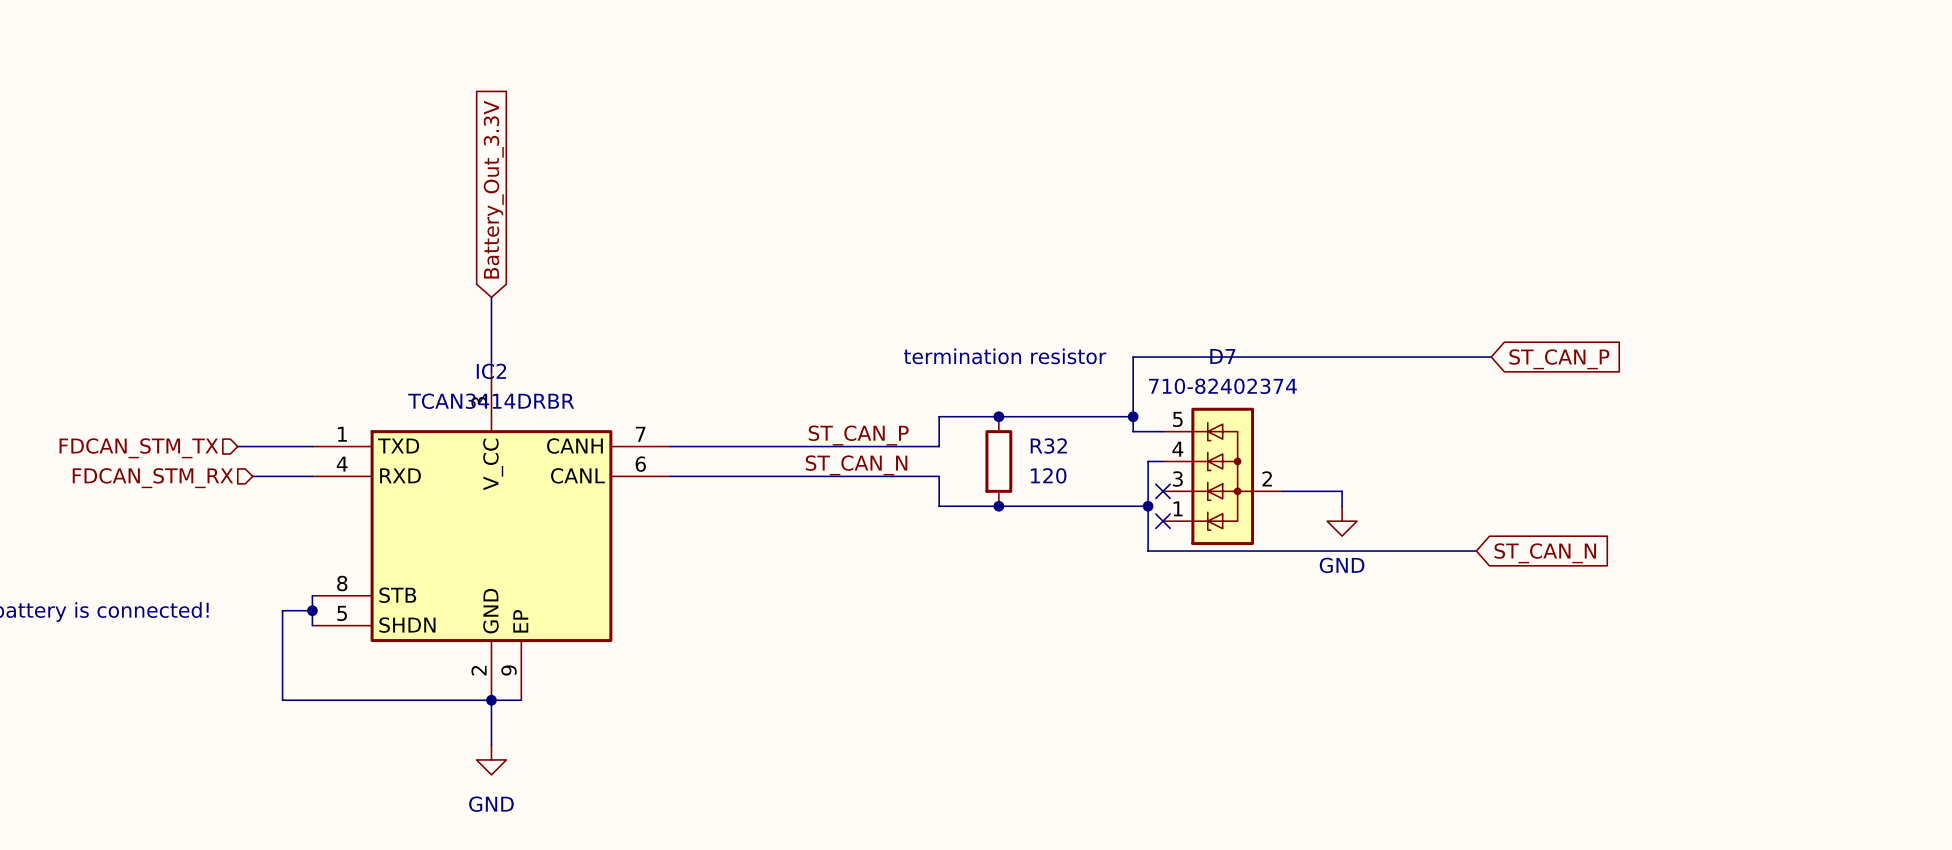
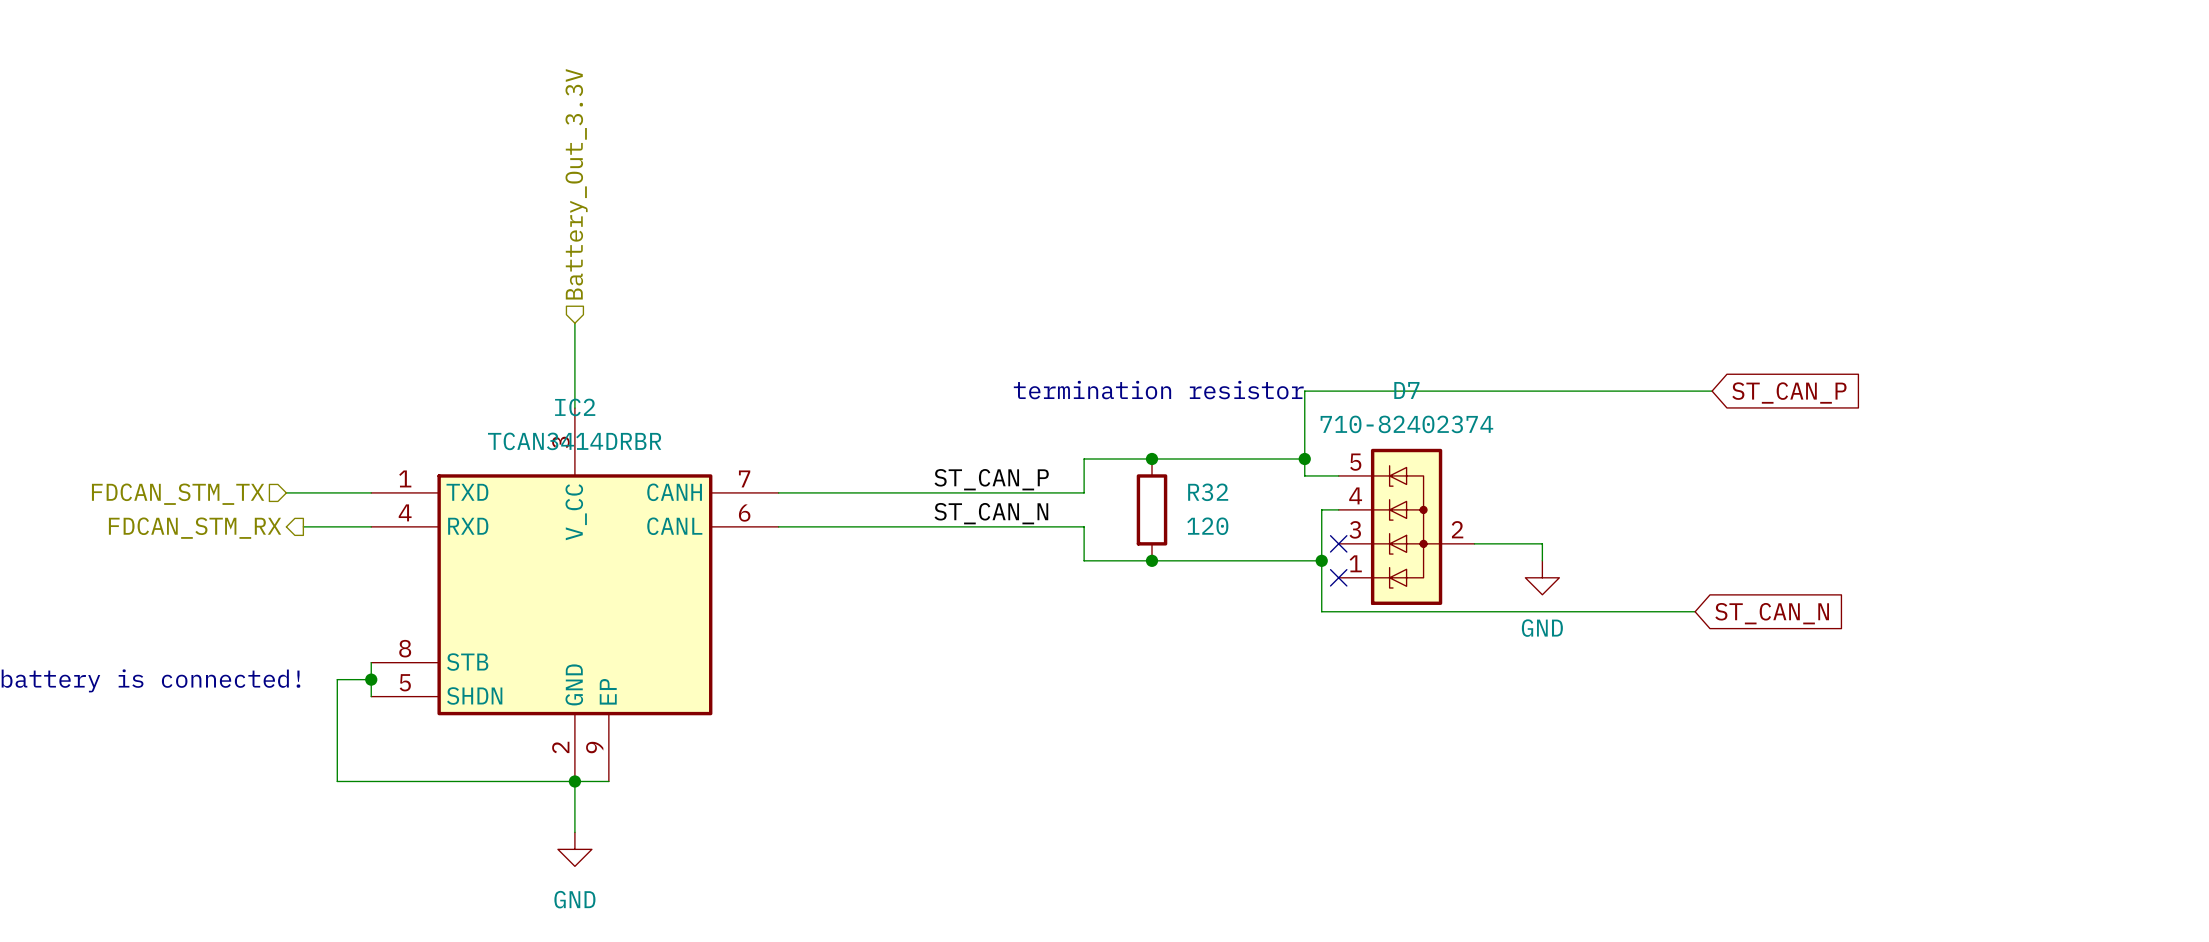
hierarchical label: none -> Battery_Out_3.3V (576, 184)
global label: Battery_Out_3.3V (493, 189) -> none
hierarchical label shape: input (152, 478) -> output (195, 528)

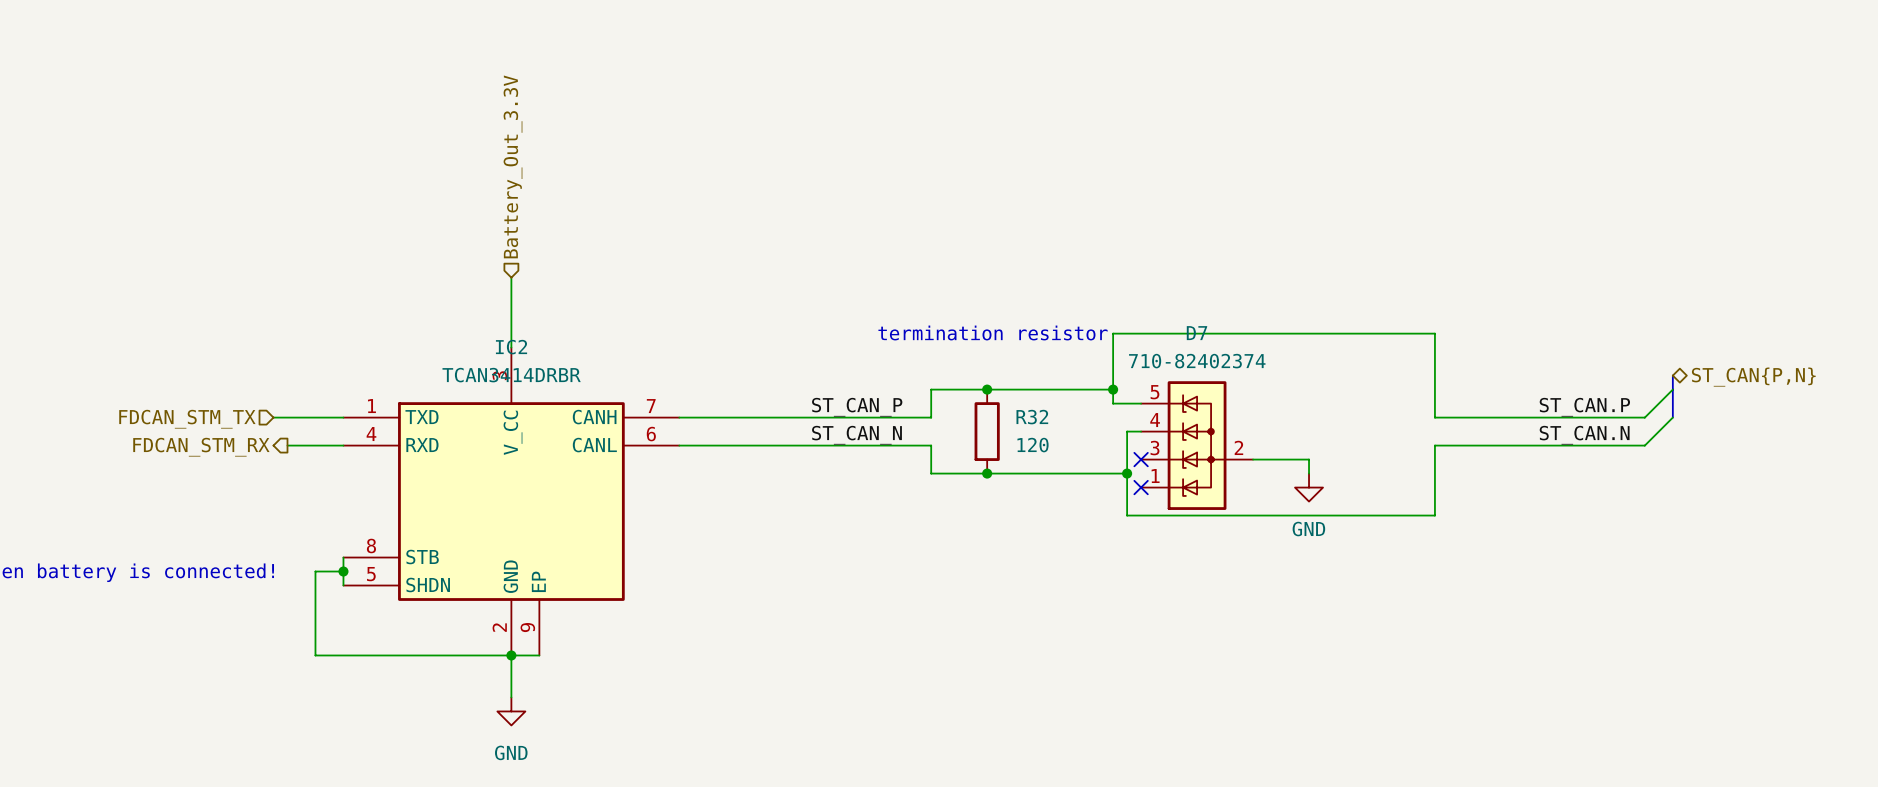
wire: (1695, 391) (1712, 391) -> (1434, 333) (1434, 417) (1644, 417) (1672, 389)
global label: ST_CAN_P (1789, 393) -> none
bus: none -> (1672, 375) (1672, 417)
hierarchical label: none -> ST_CAN{P,N} (1753, 377)
label: none -> ST_CAN.P (1584, 407)
wire: none -> (1672, 417) (1644, 445) (1434, 445) (1434, 515)
label: none -> ST_CAN.N (1584, 435)
global label: ST_CAN_N (1772, 613) -> none

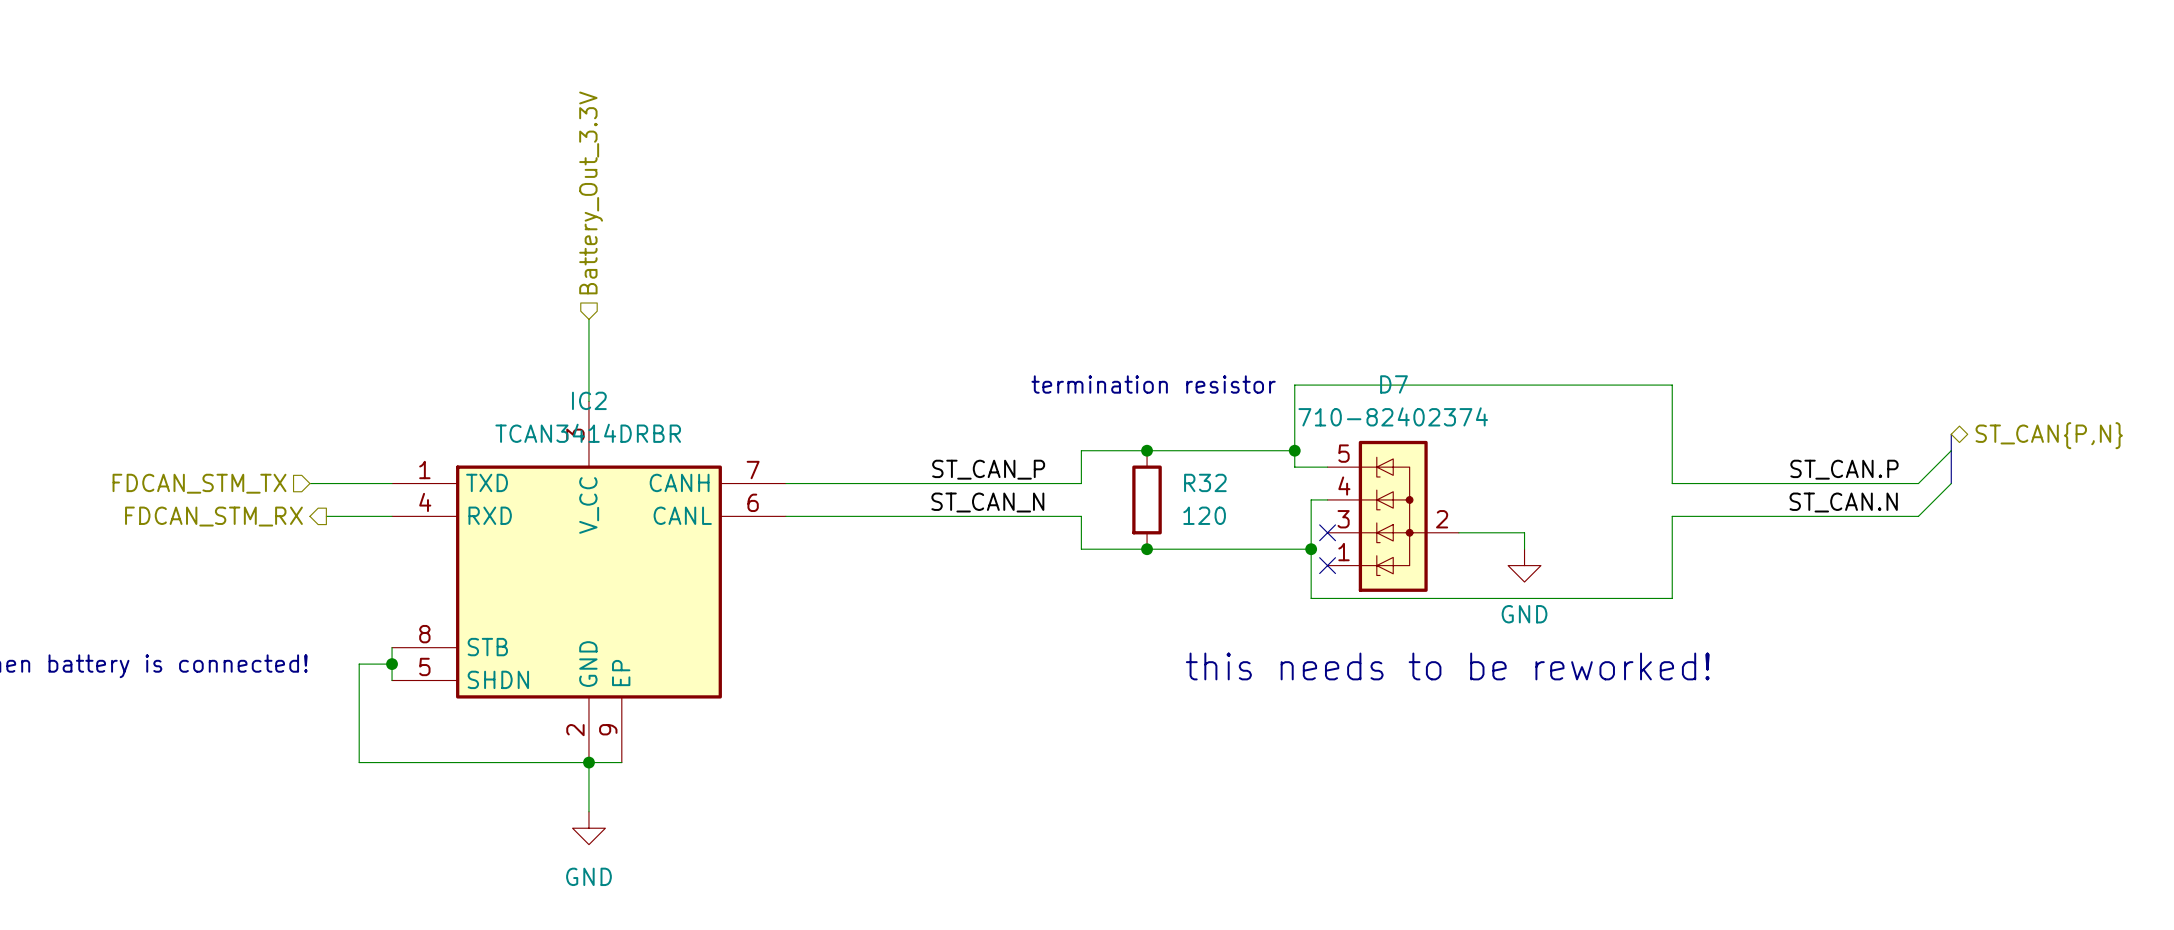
text: none -> this needs to be reworked! (1447, 666)

